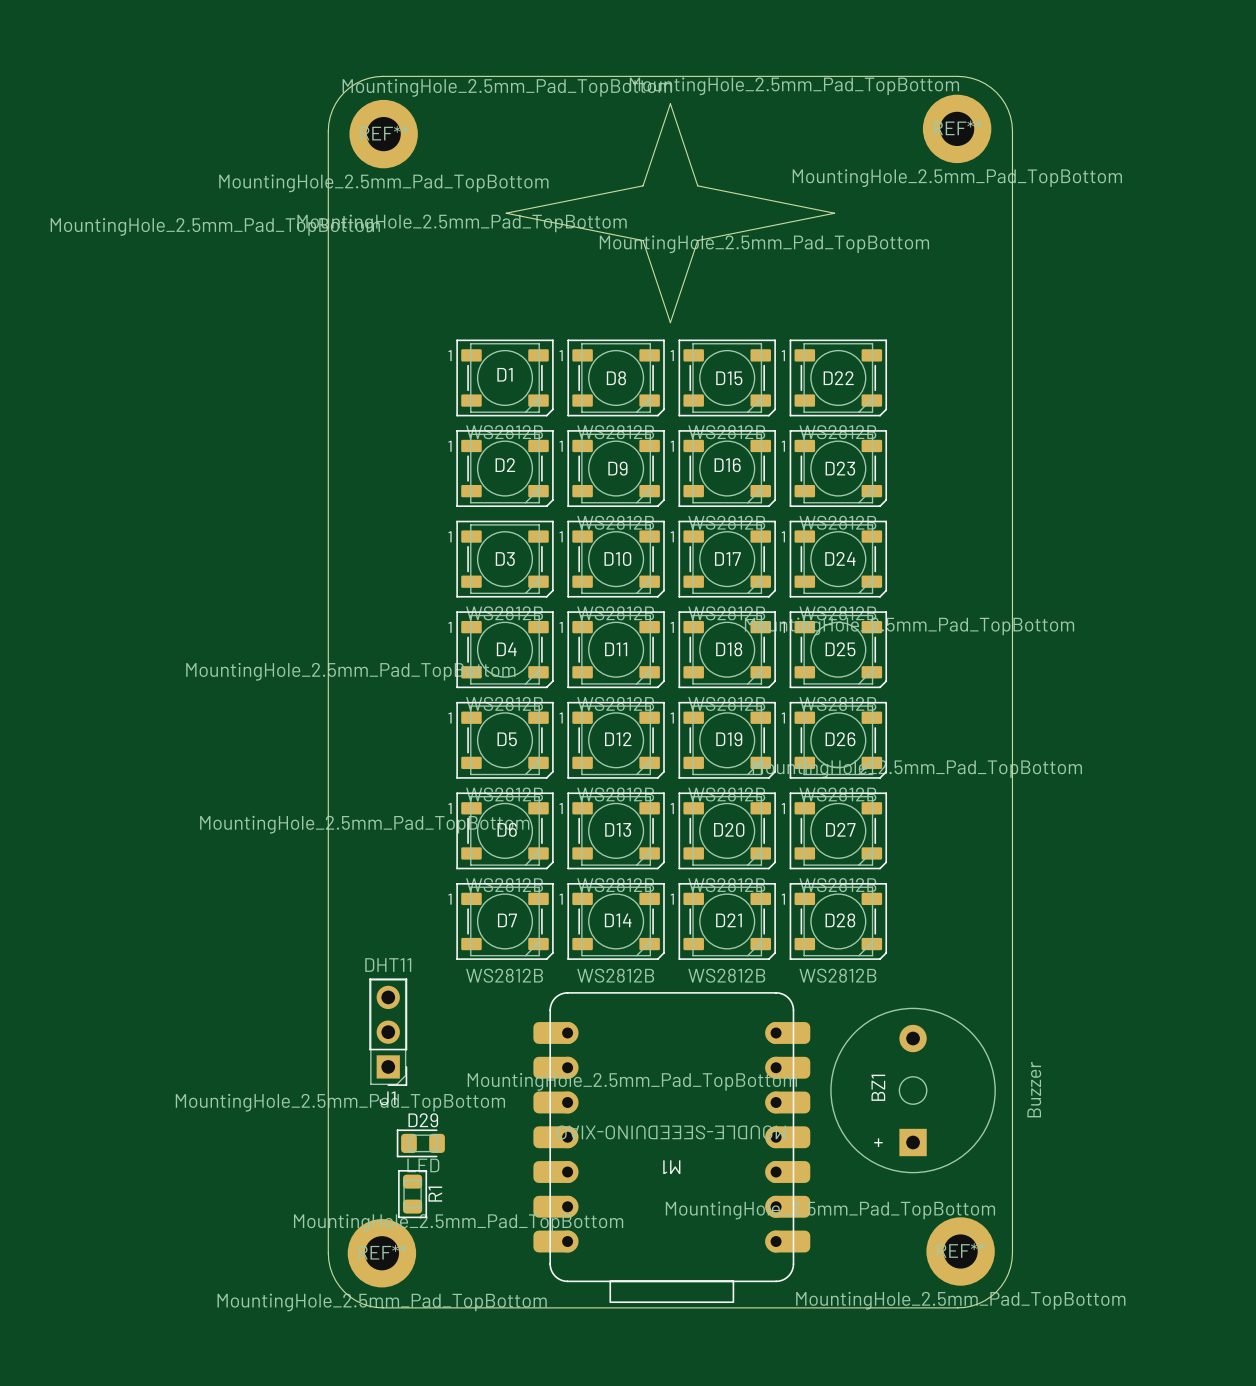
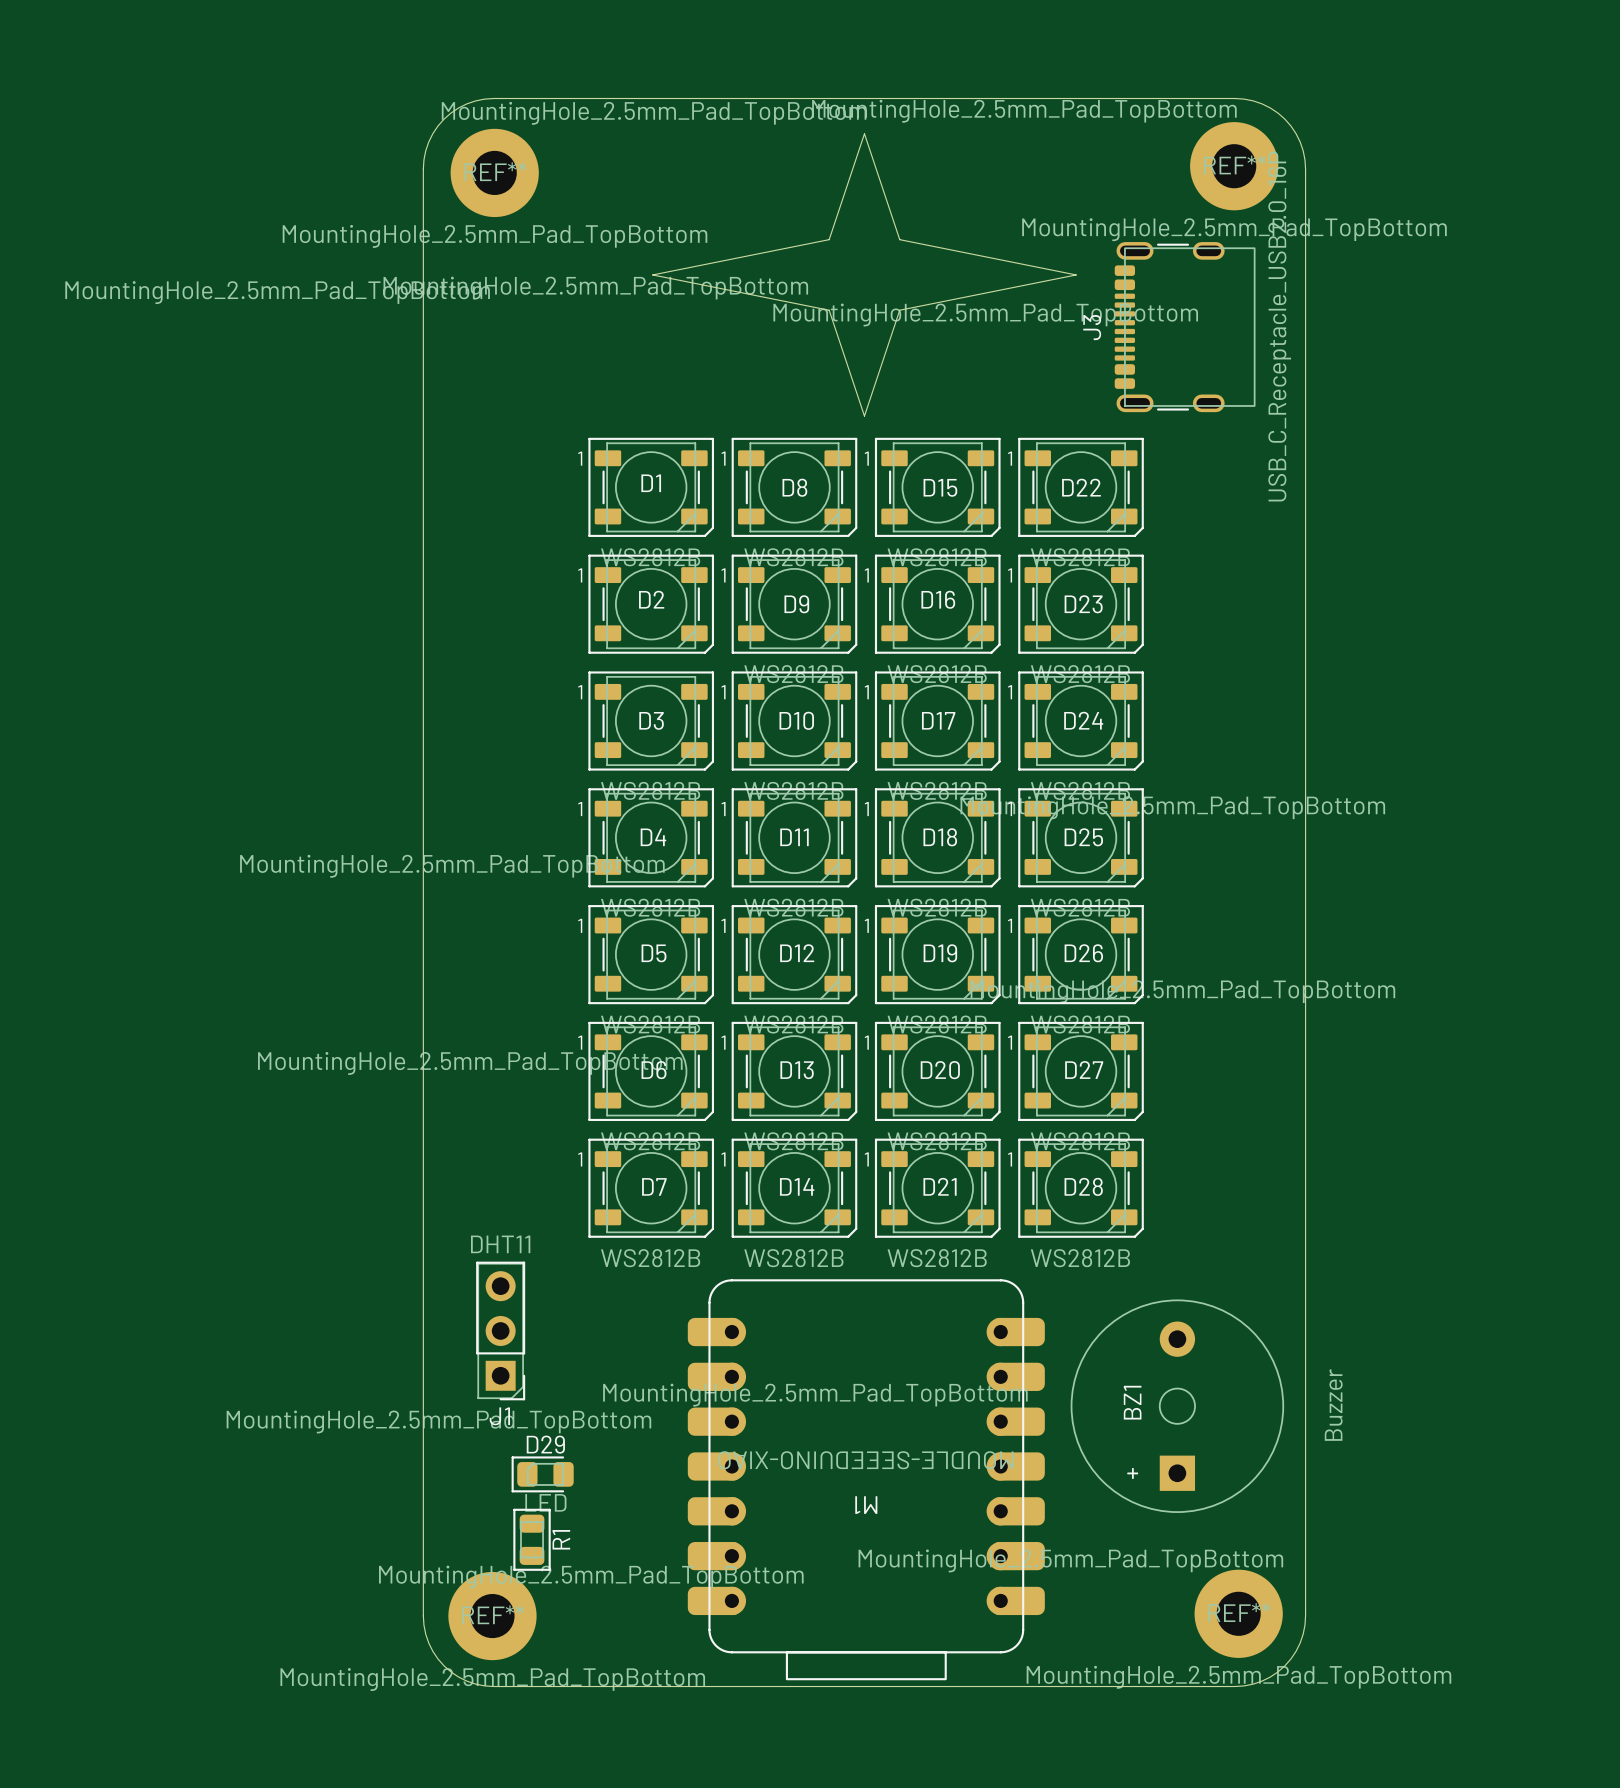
J3: none -> USB_C_Receptacle_USB2.0_16P (1185, 327)

